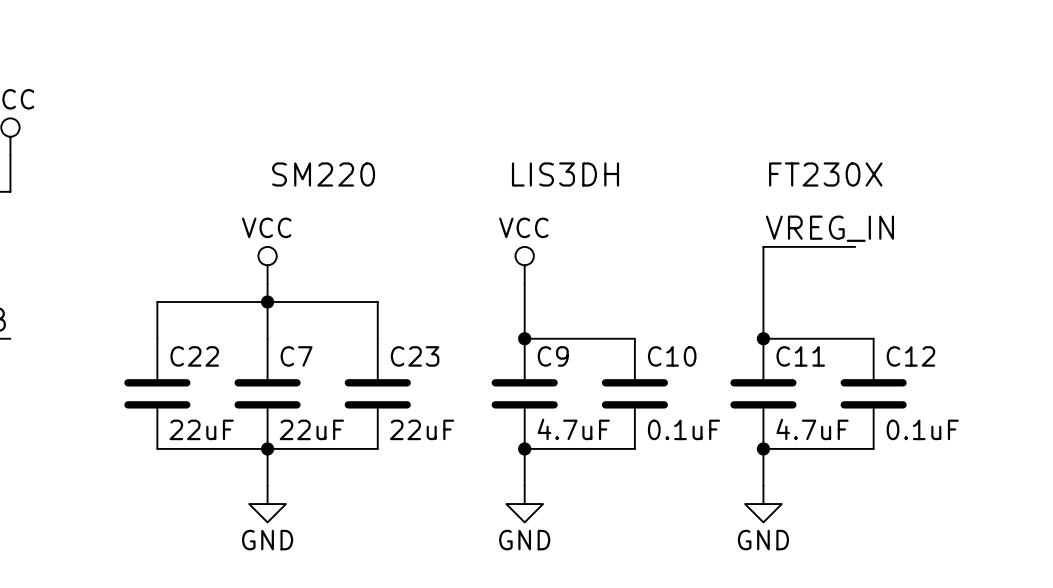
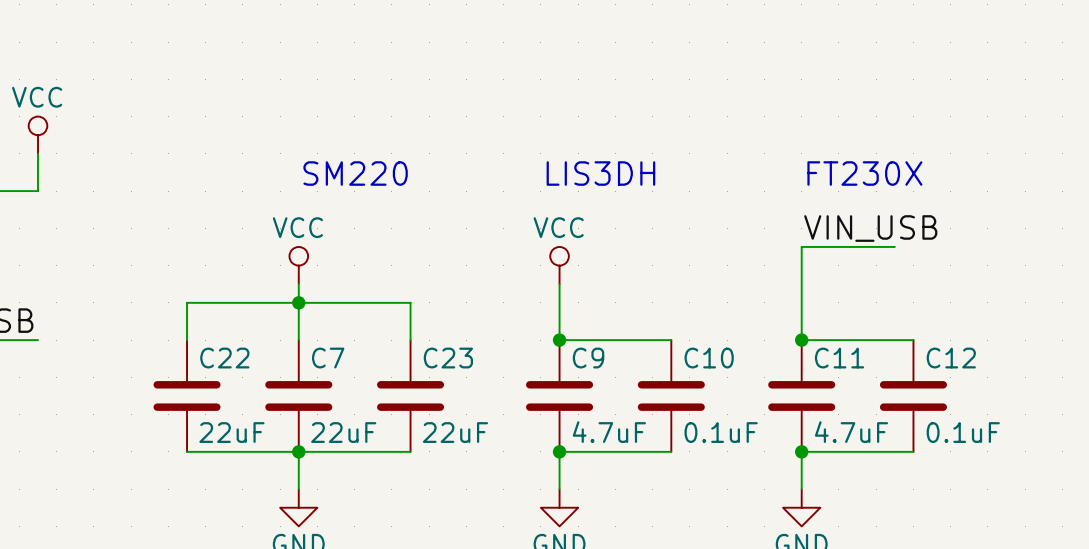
label: VREG_IN (829, 228) -> VIN_USB (870, 228)

